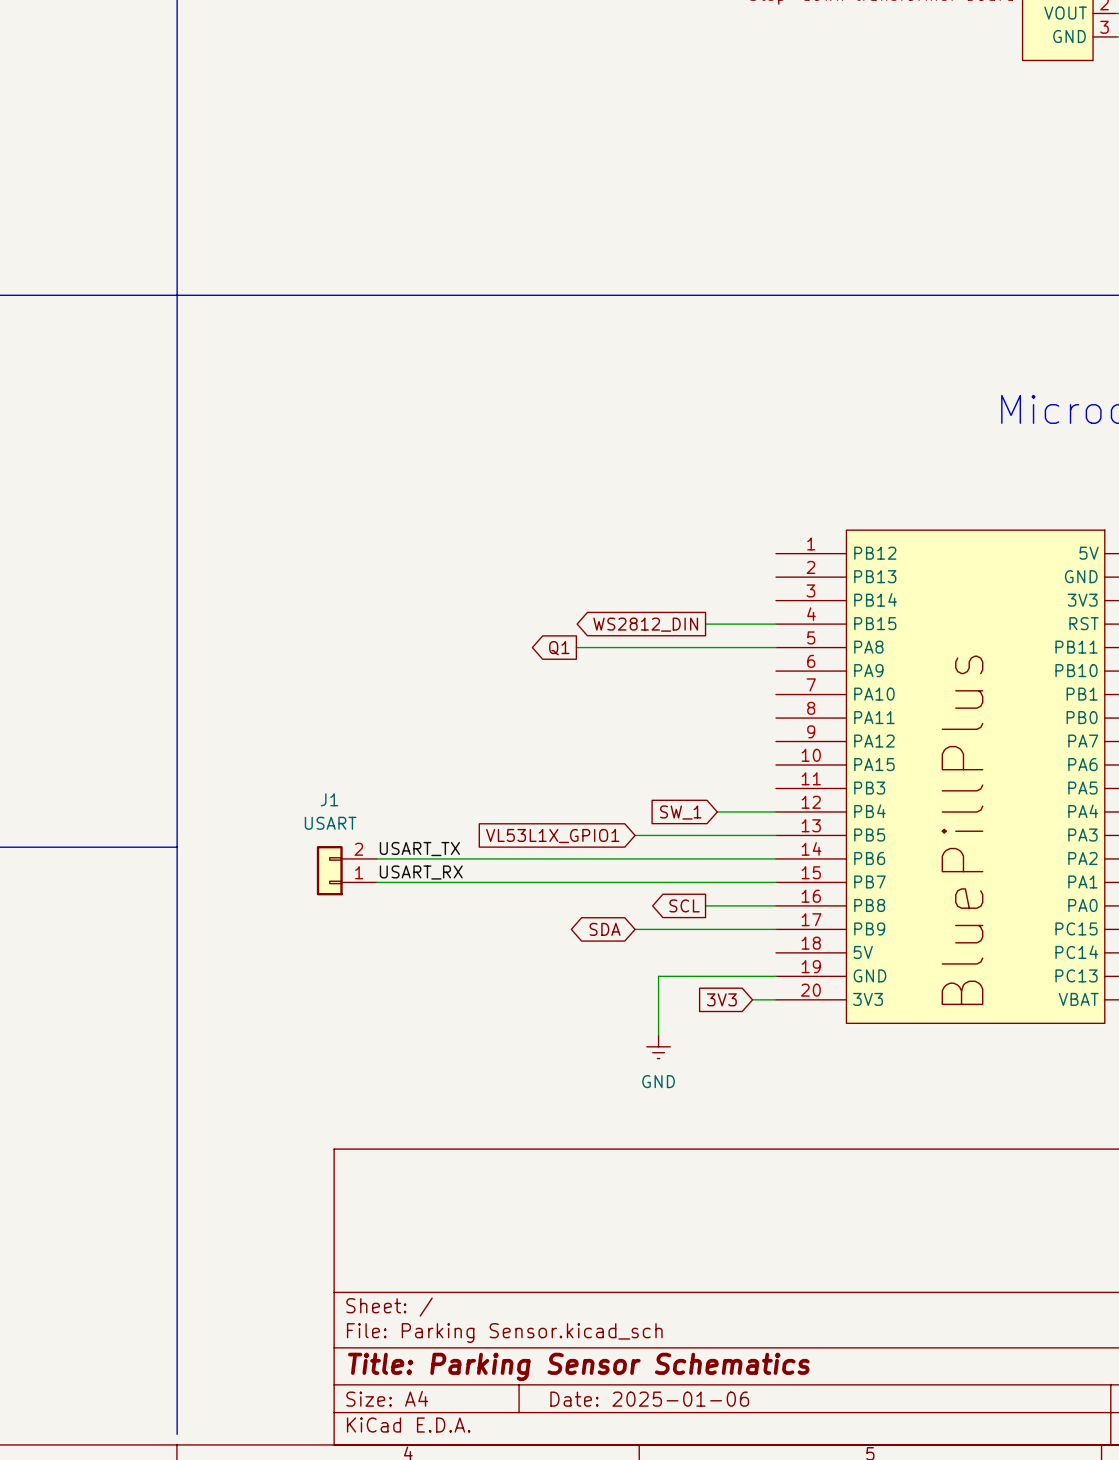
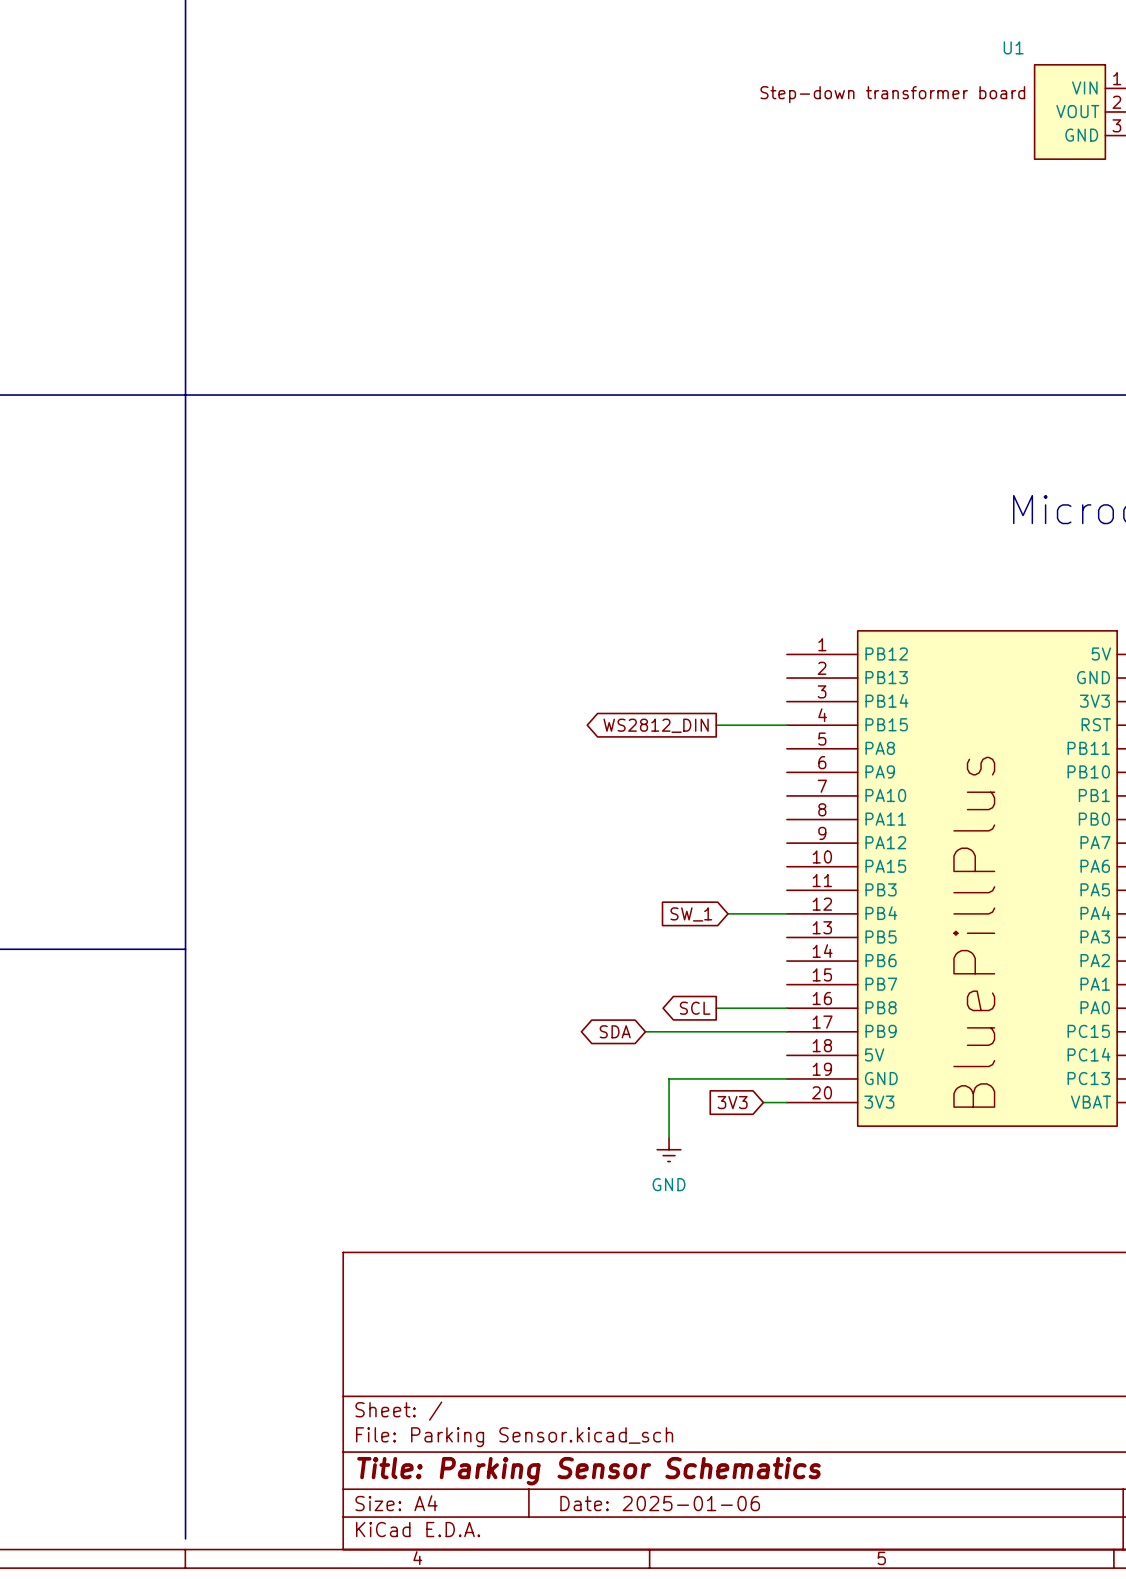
wire: (576, 647) (775, 647) -> none
global label: Q1 (559, 648) -> none
wire: (635, 835) (775, 835) -> none
global label: VL53L1X_GPIO1 (552, 836) -> none
label: USART_TX (419, 849) -> none
wire: (376, 858) (775, 858) -> none
J1: USART (346, 870) -> none
label: USART_RX (421, 872) -> none
wire: (376, 882) (775, 882) -> none

